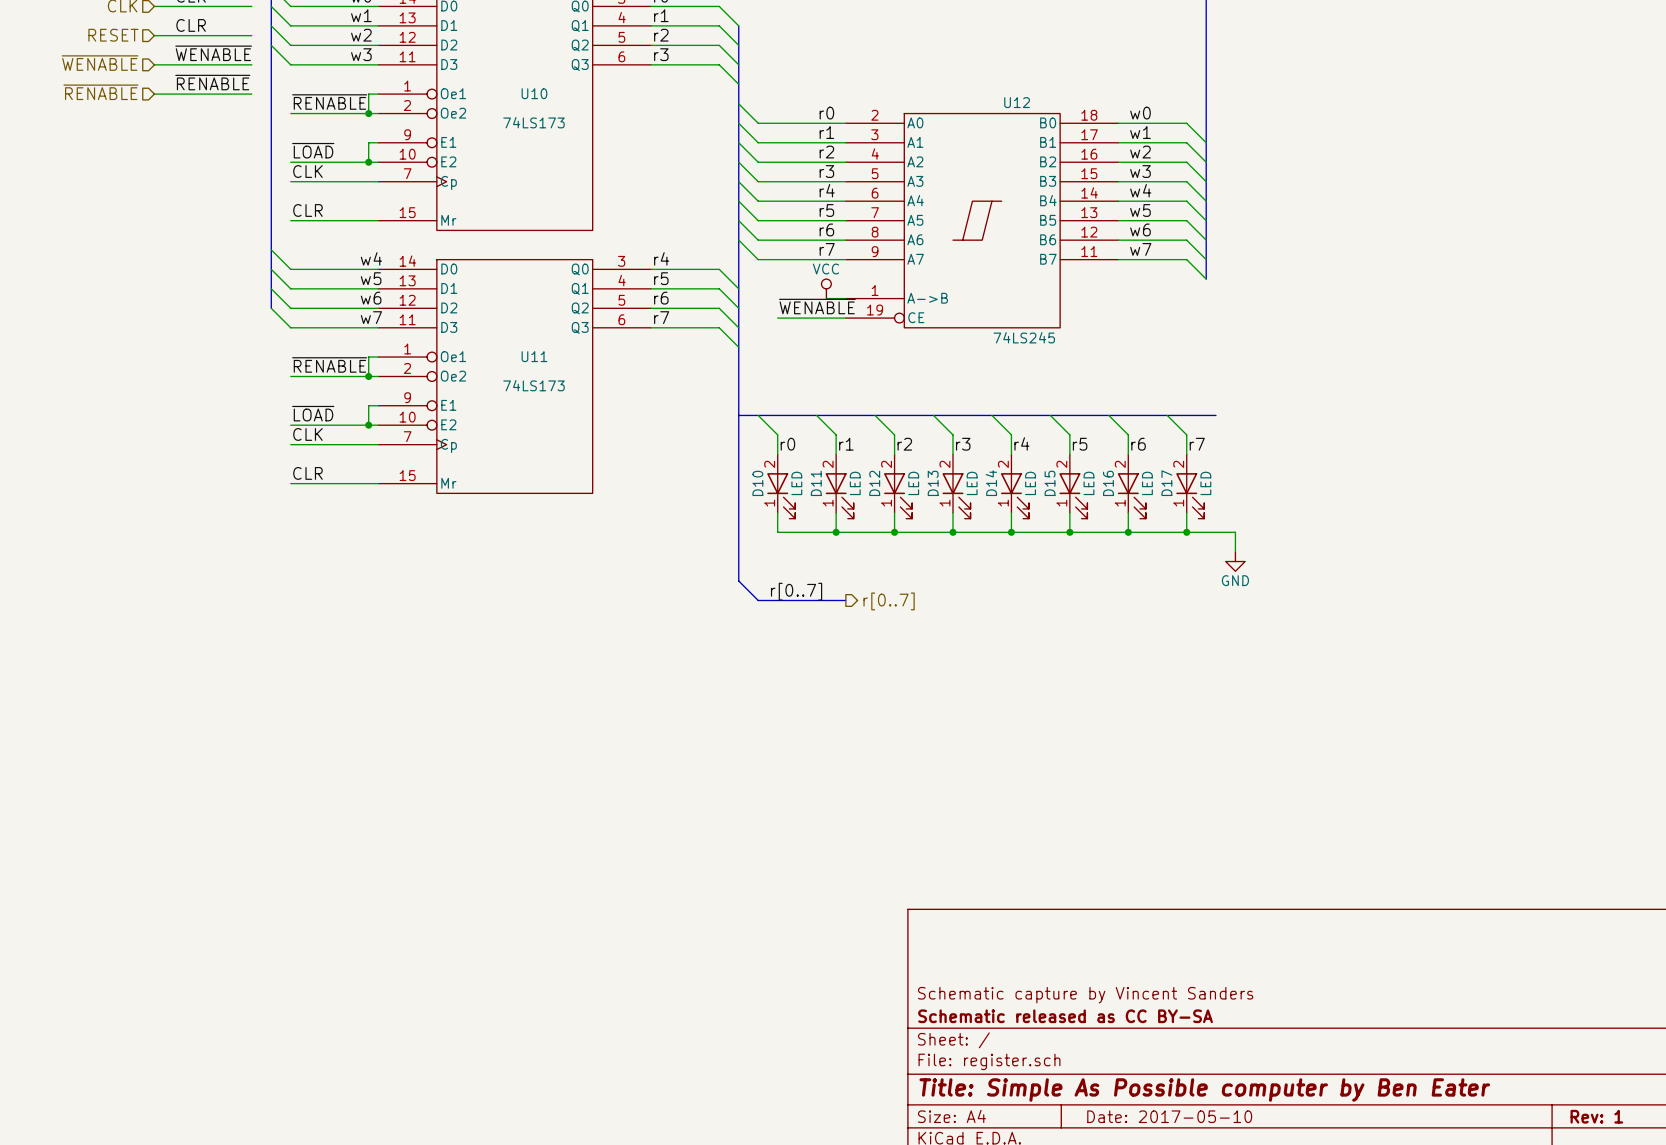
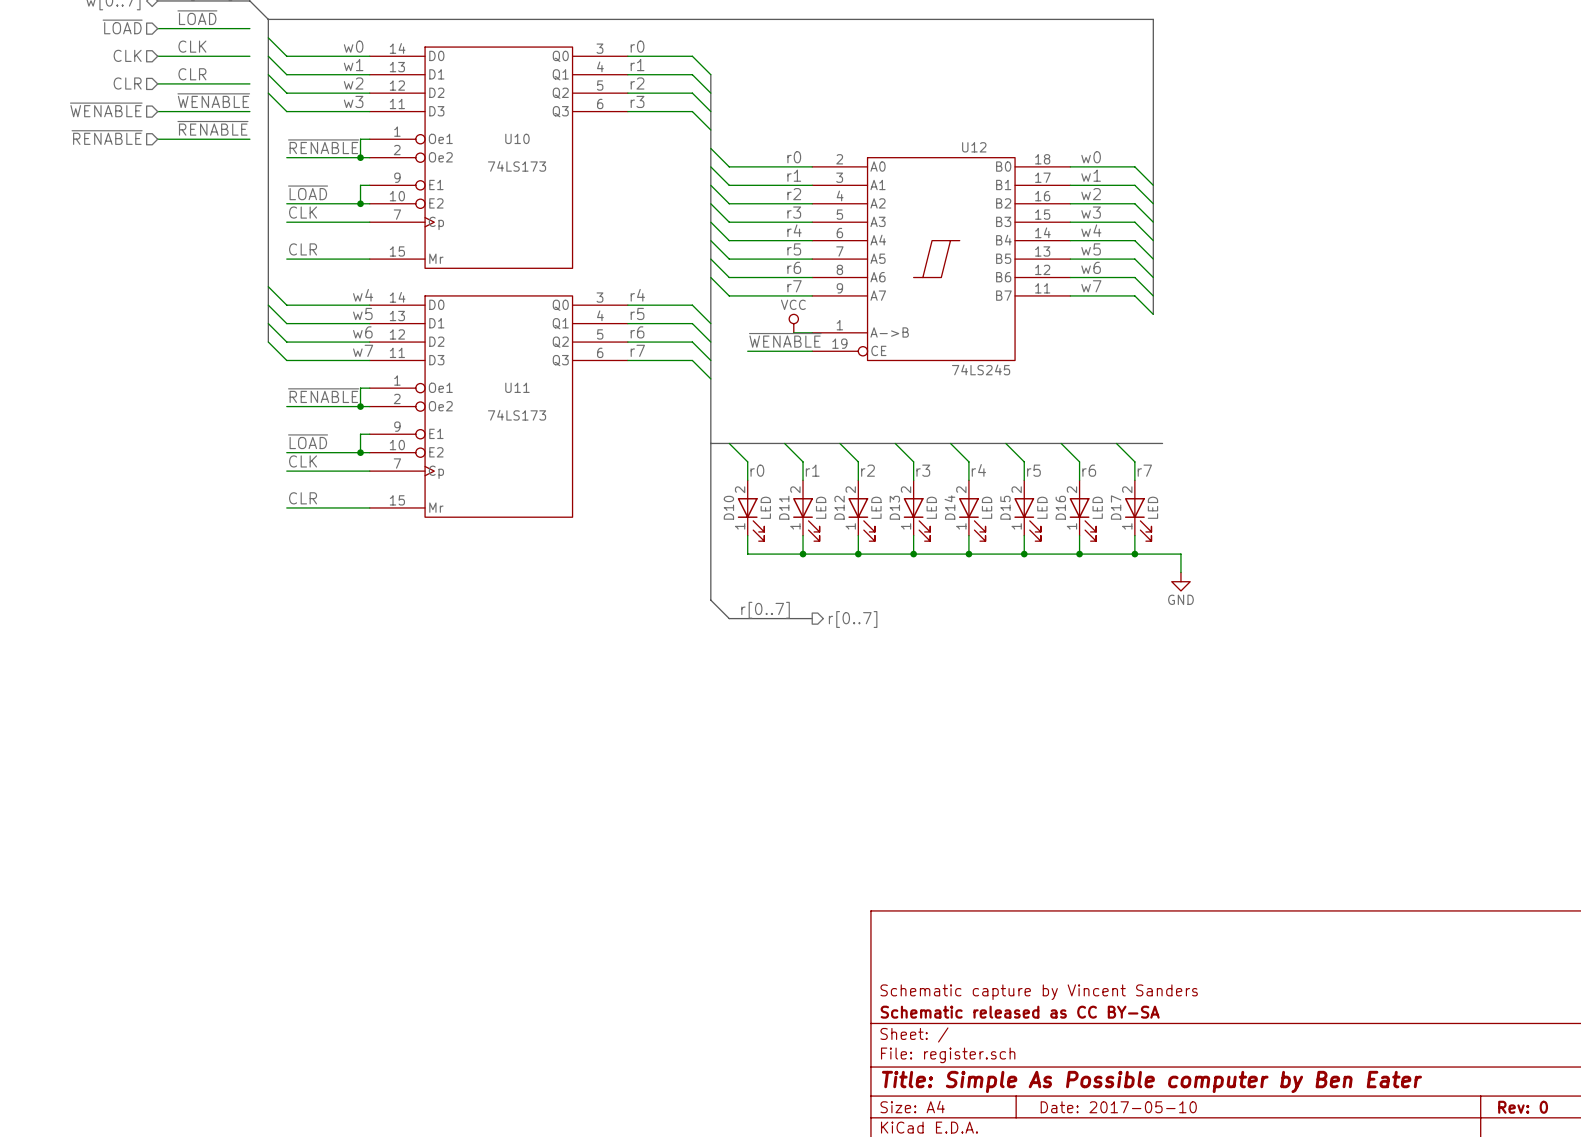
hierarchical label: RESET (113, 35) -> CLR (127, 83)
title block: Rev: 1 (1596, 1116) -> Rev: 0 (1523, 1107)

